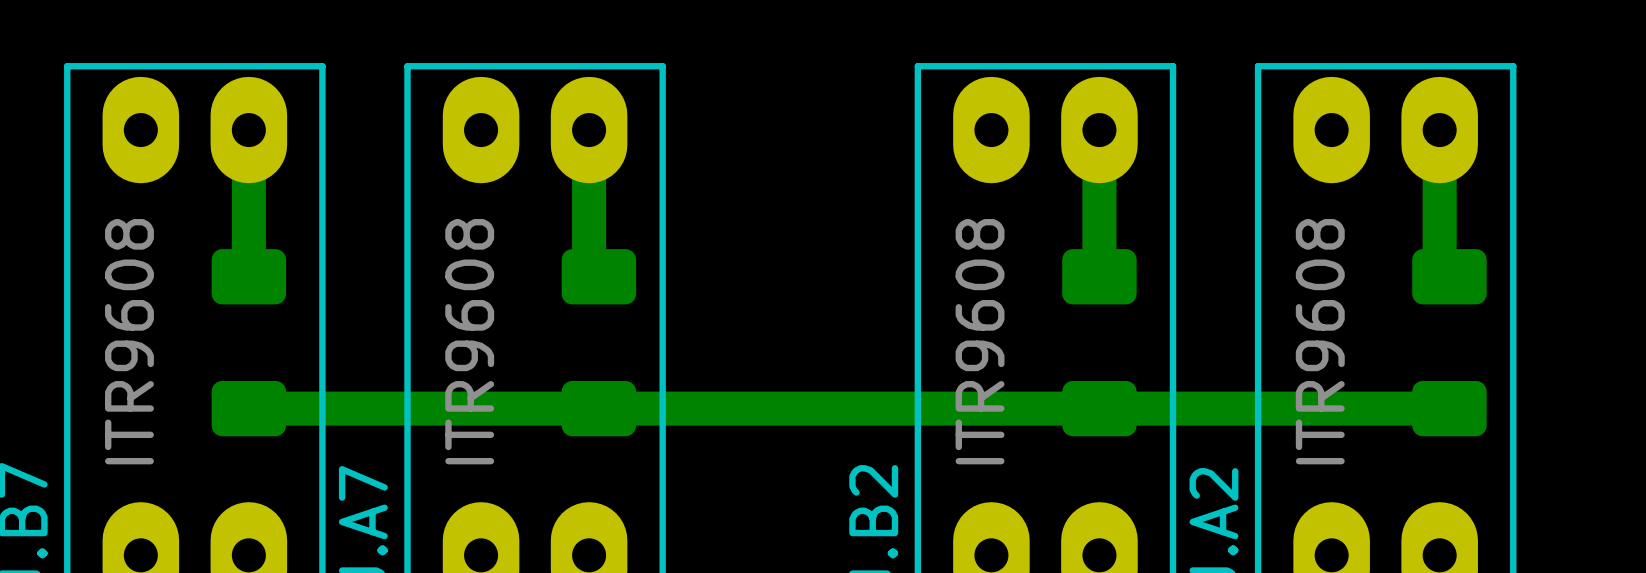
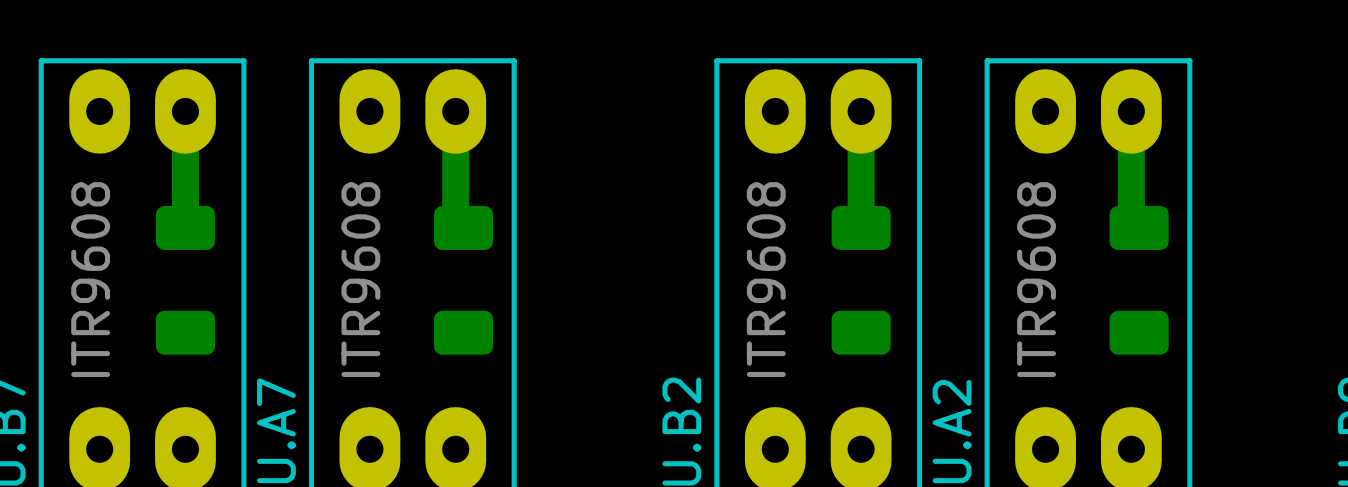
bottom track: (248, 408) (1449, 408) -> none

